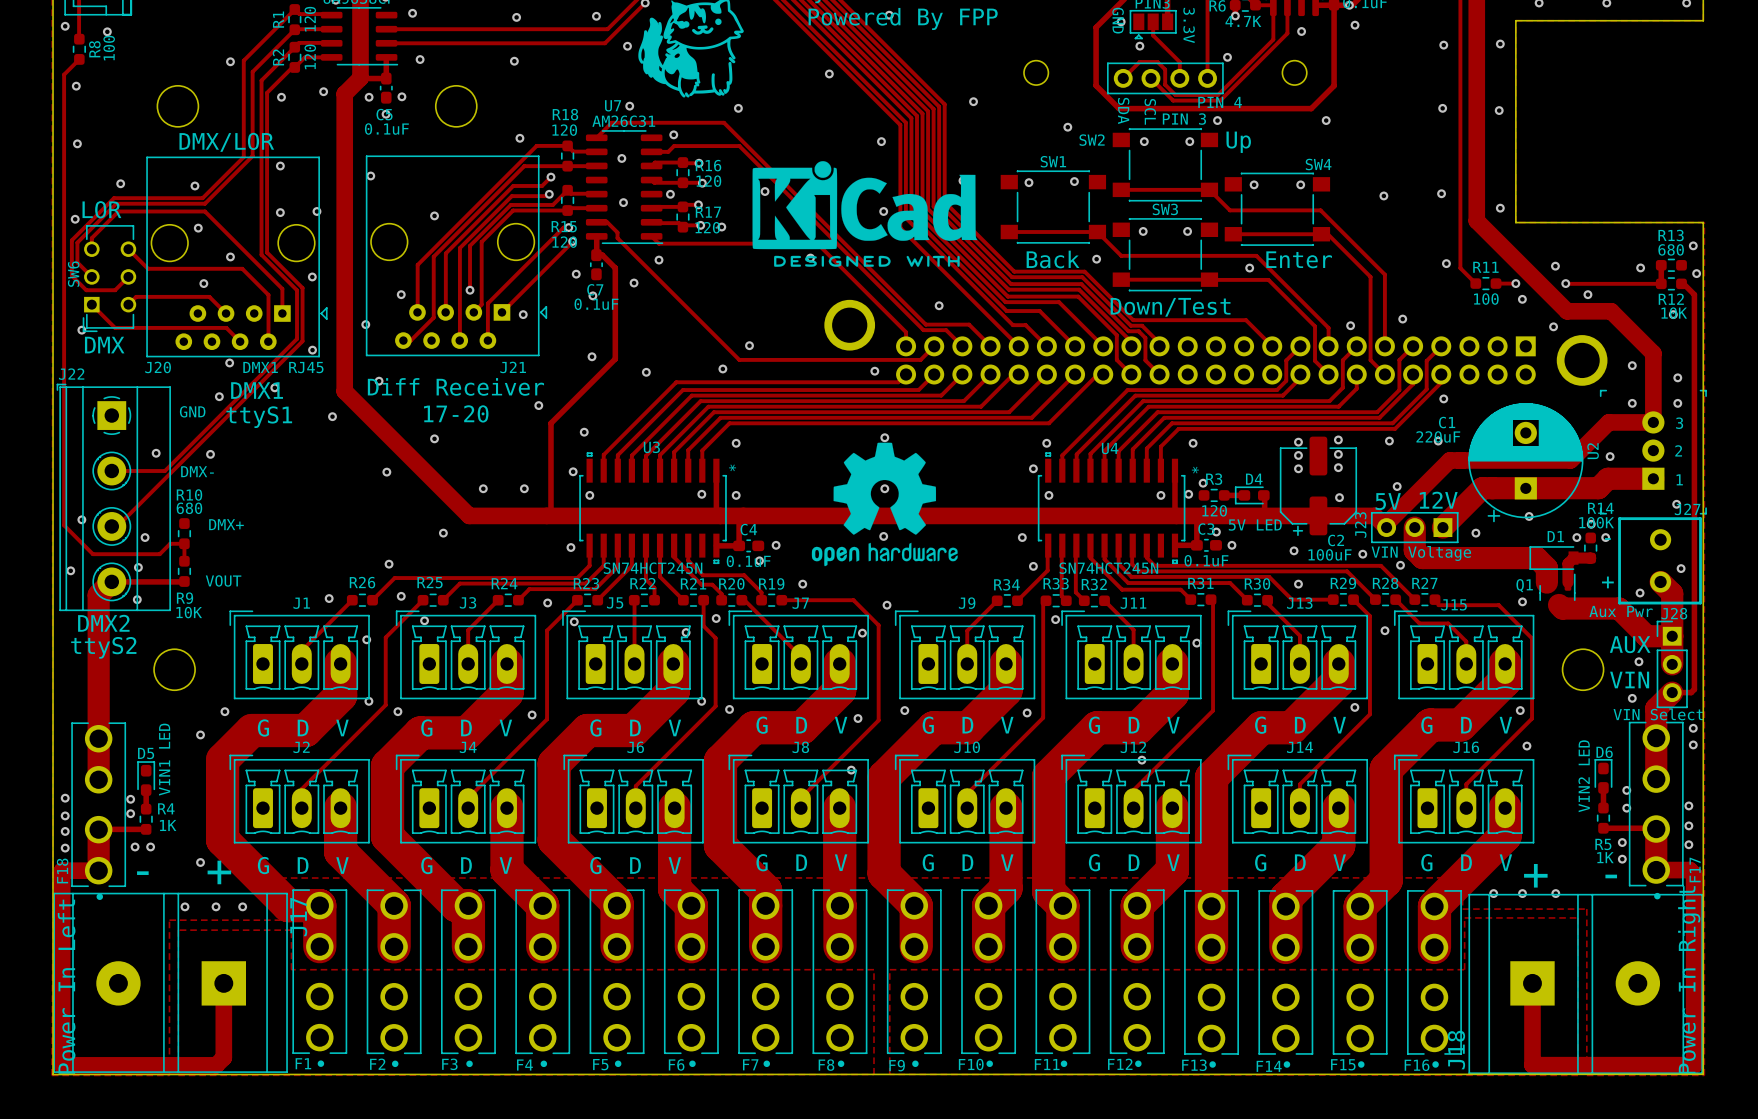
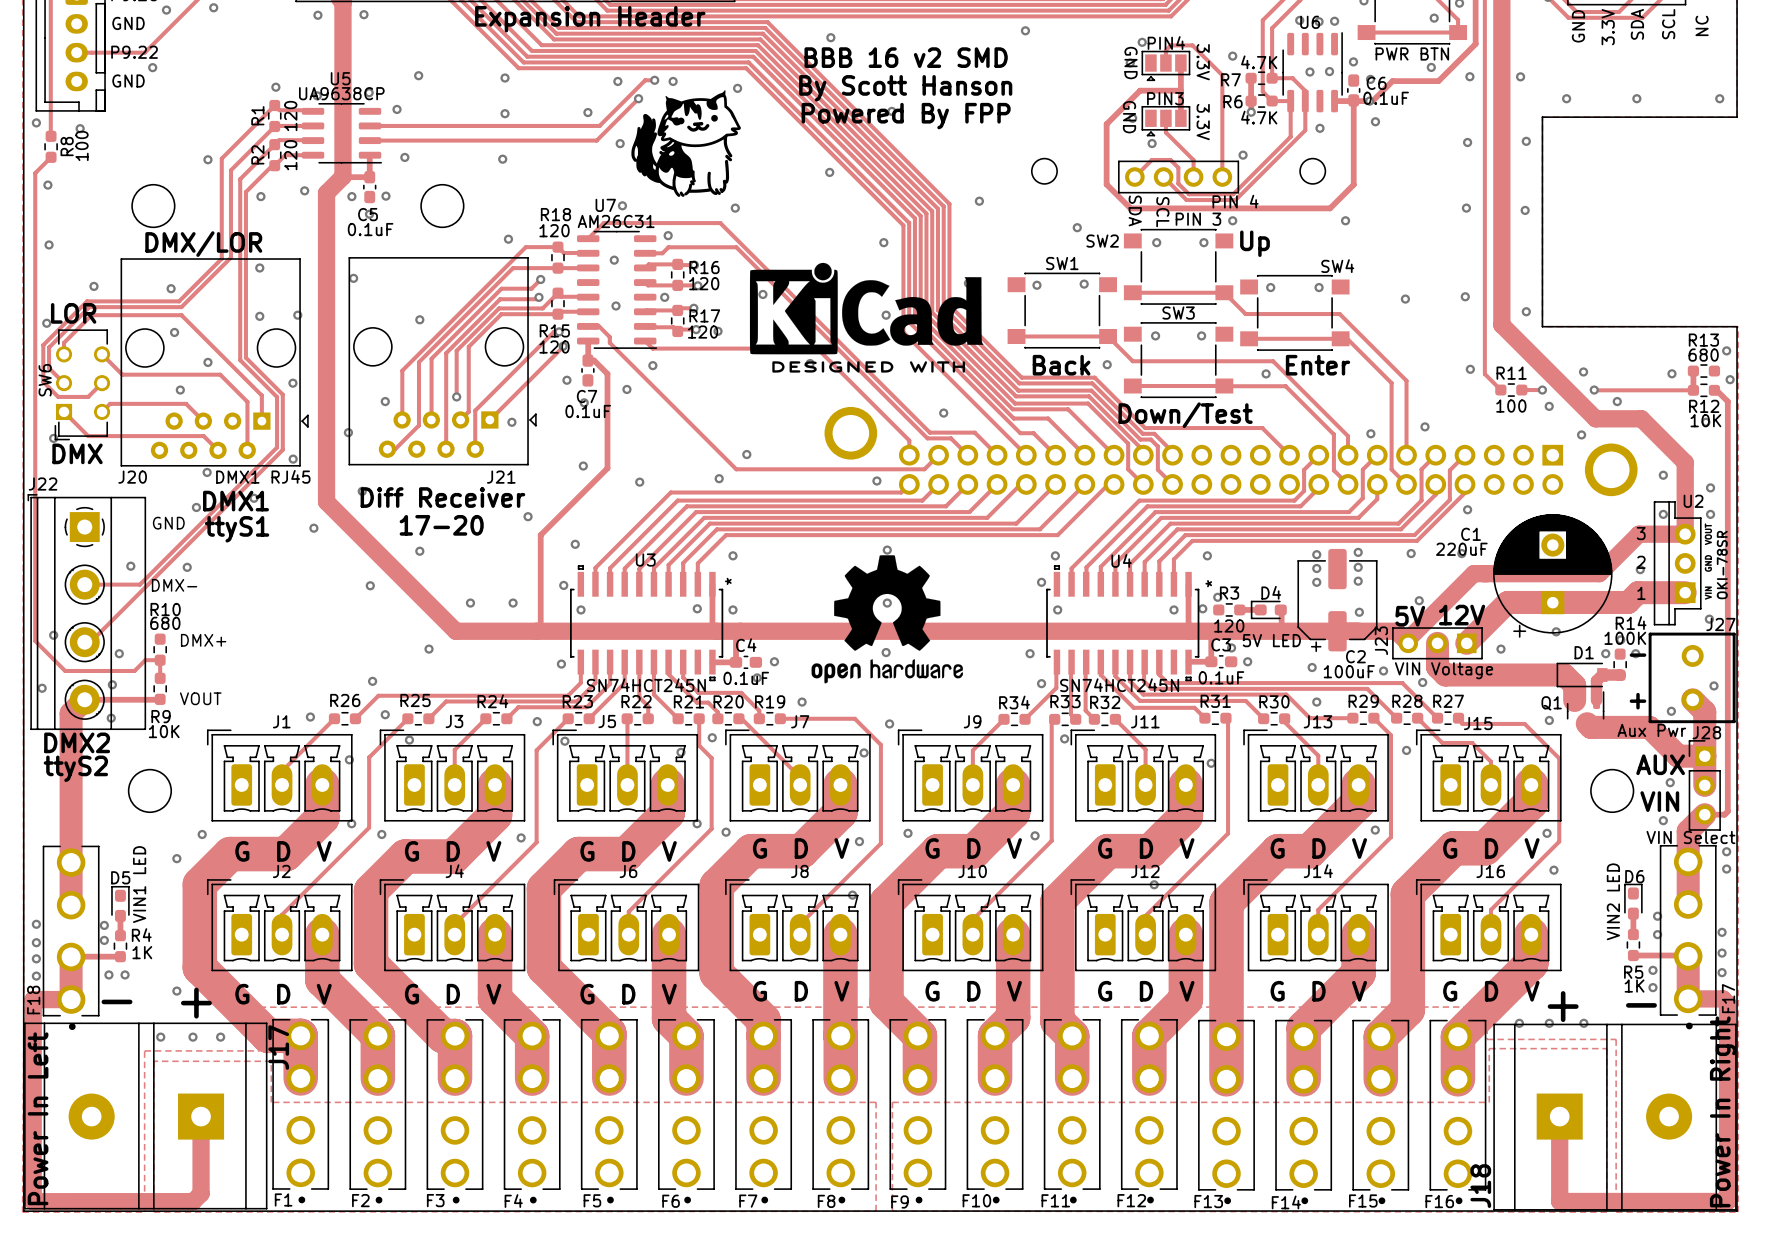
U2 footprint: [1600, 390, 1707, 515] -> [1653, 501, 1702, 626]
text position: 3 (1679, 423) -> 3 (1641, 533)
text position: 2 (1678, 450) -> 2 (1641, 562)
U2 name position: U2 (1593, 451) -> U2 (1693, 501)
text position: 1 (1679, 479) -> 1 (1641, 593)

